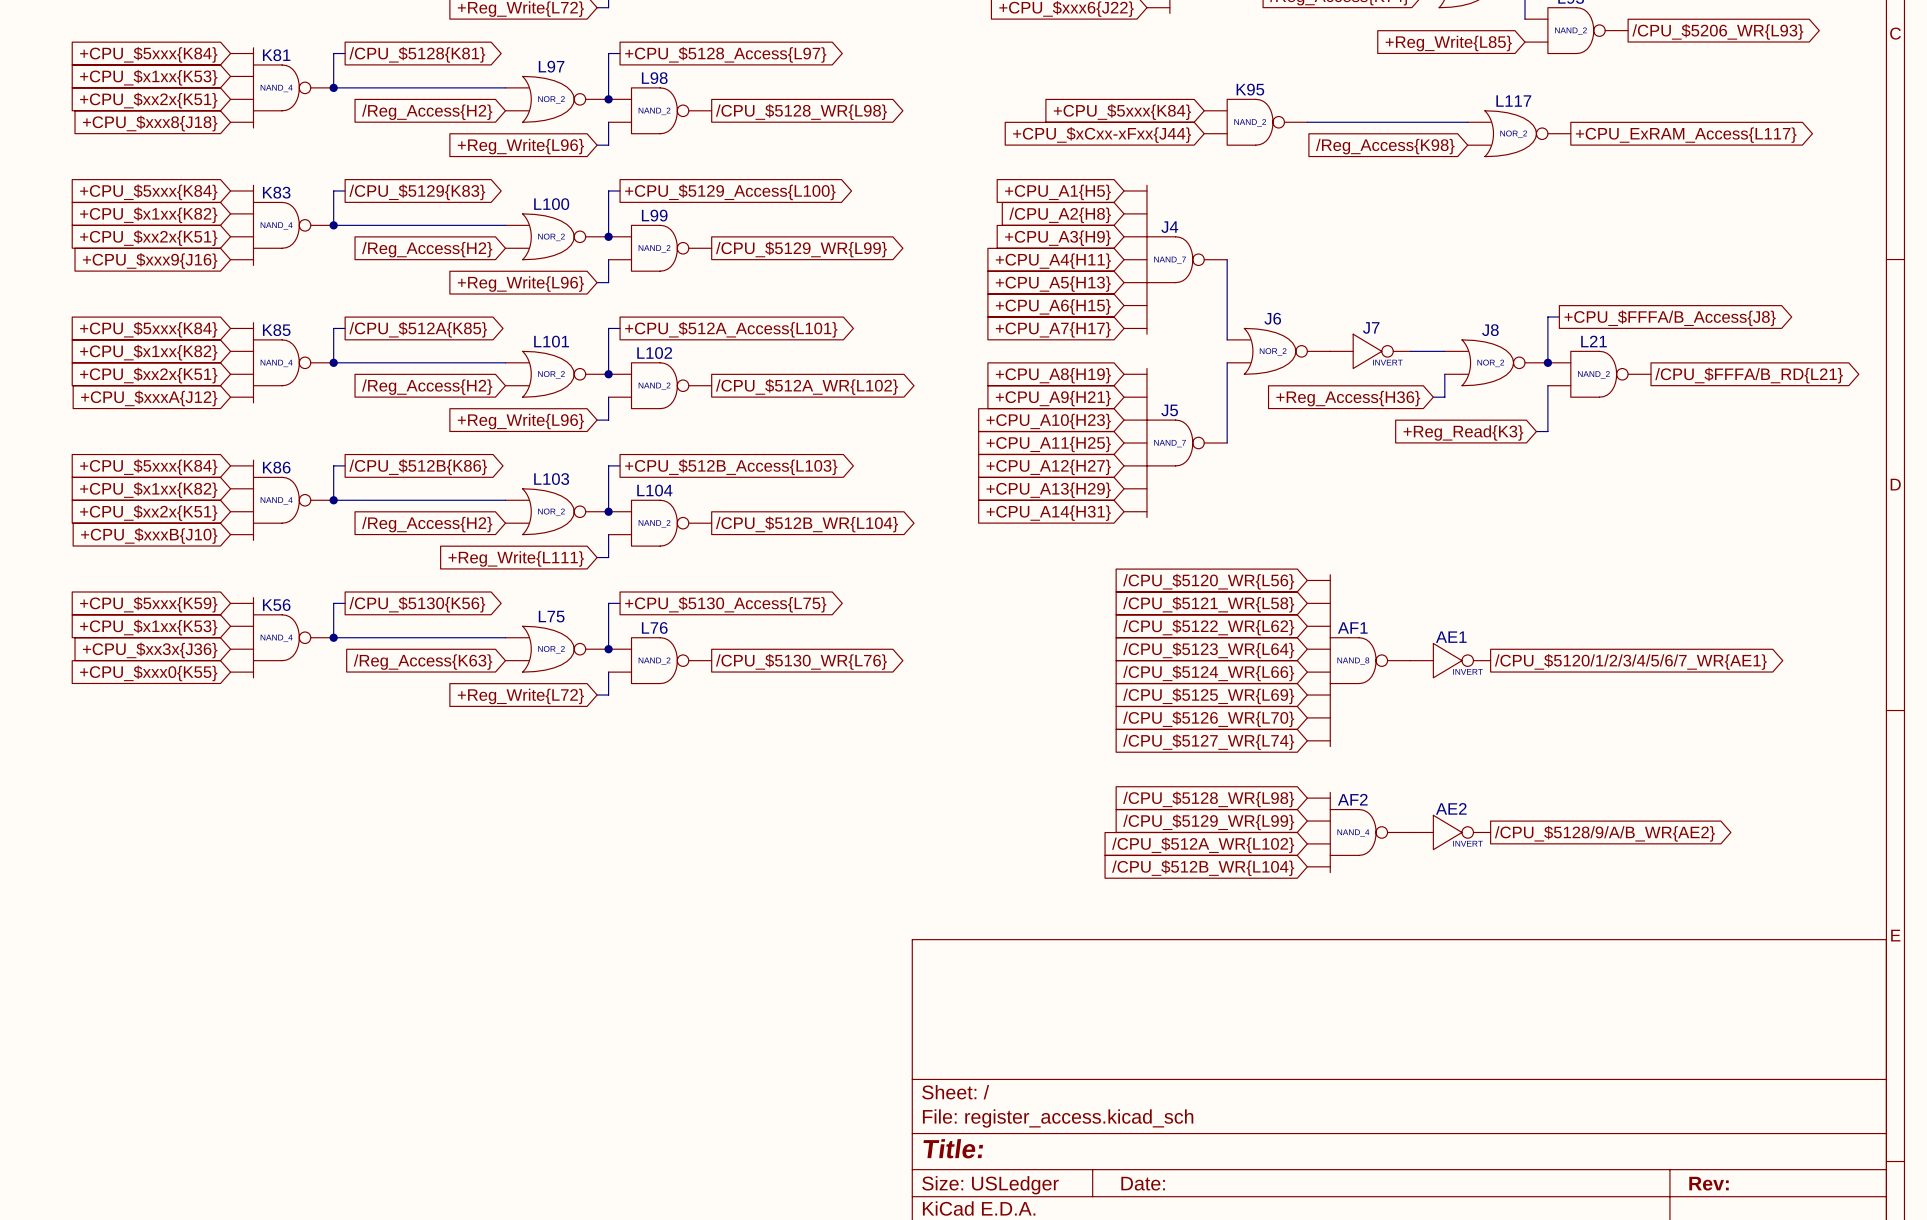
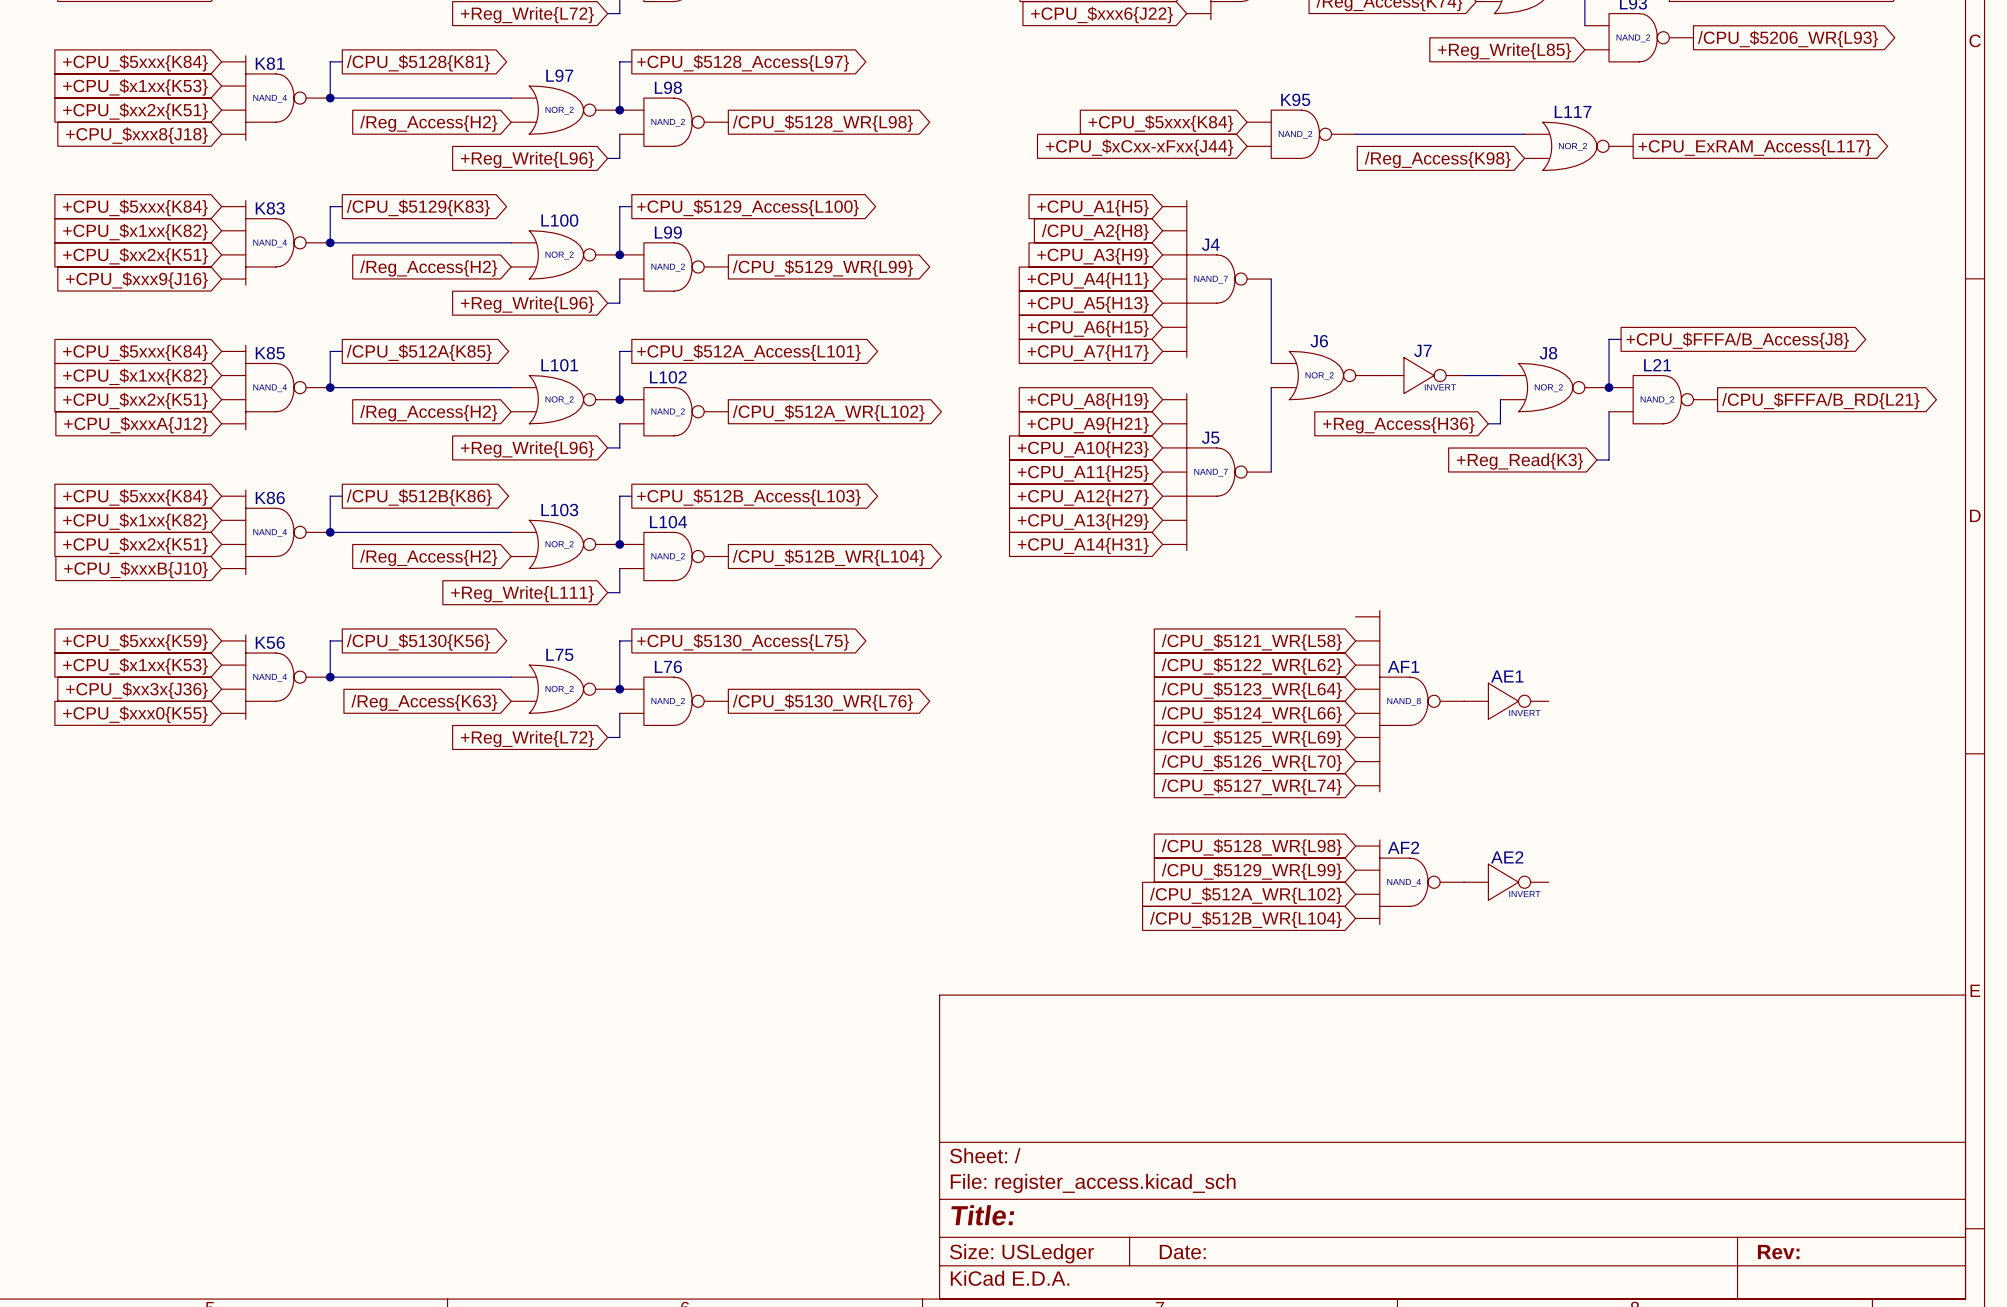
global label: /CPU_$5120_WR{L56} (1208, 581) -> none
global label: /CPU_$5120/1/2/3/4/5/6/7_WR{AE1} (1630, 661) -> none
global label: /CPU_$5128/9/A/B_WR{AE2} (1604, 833) -> none

